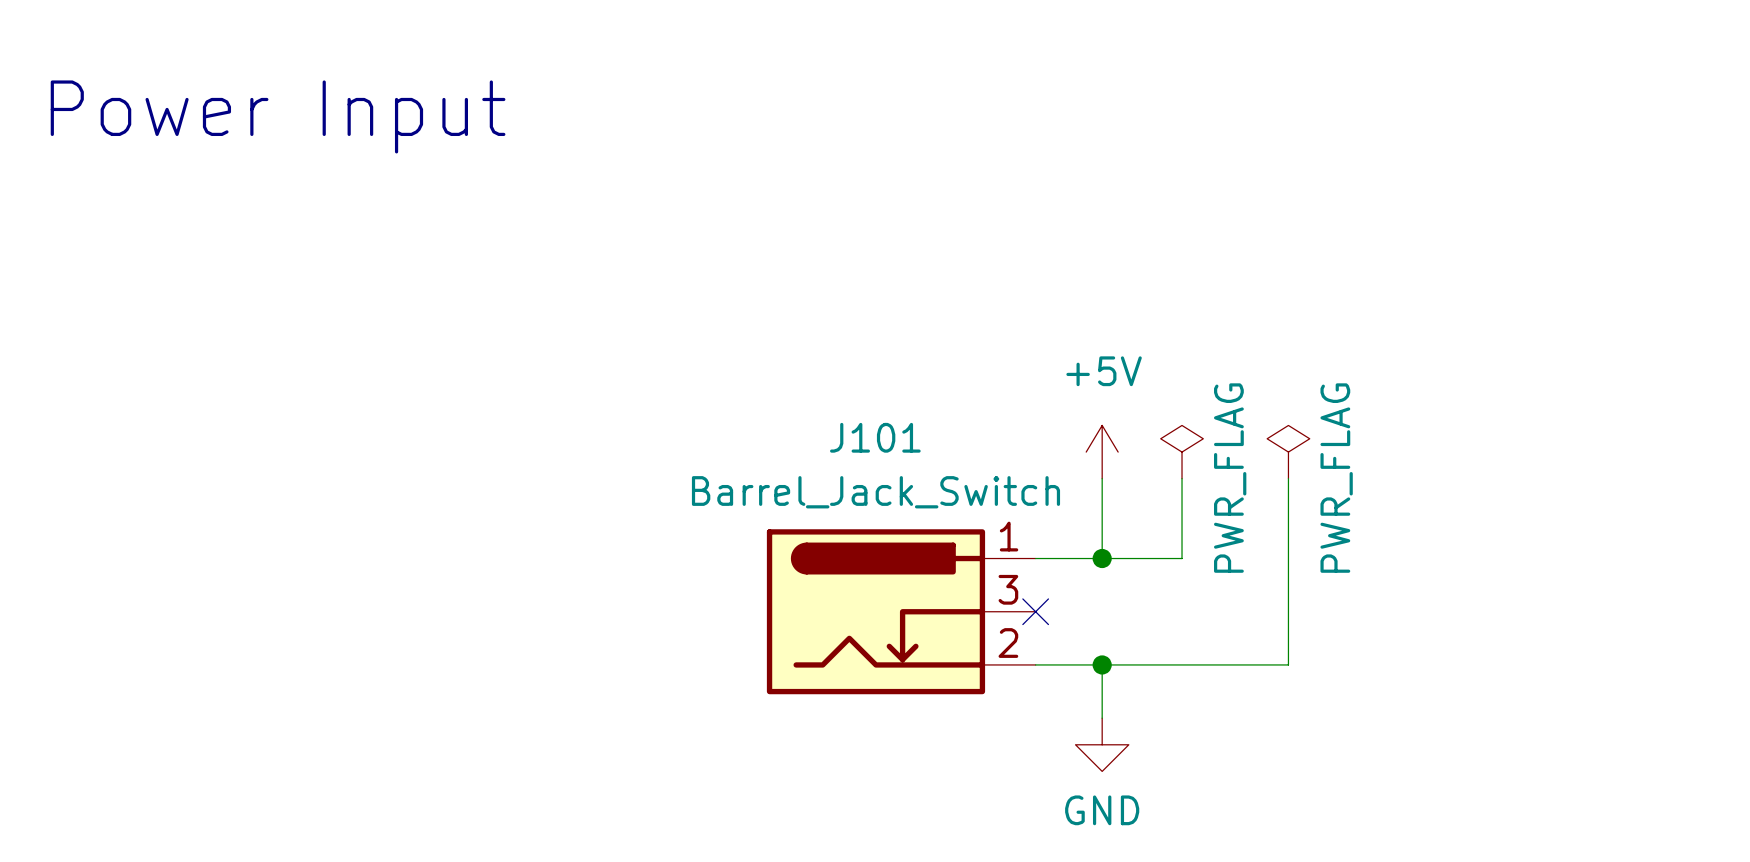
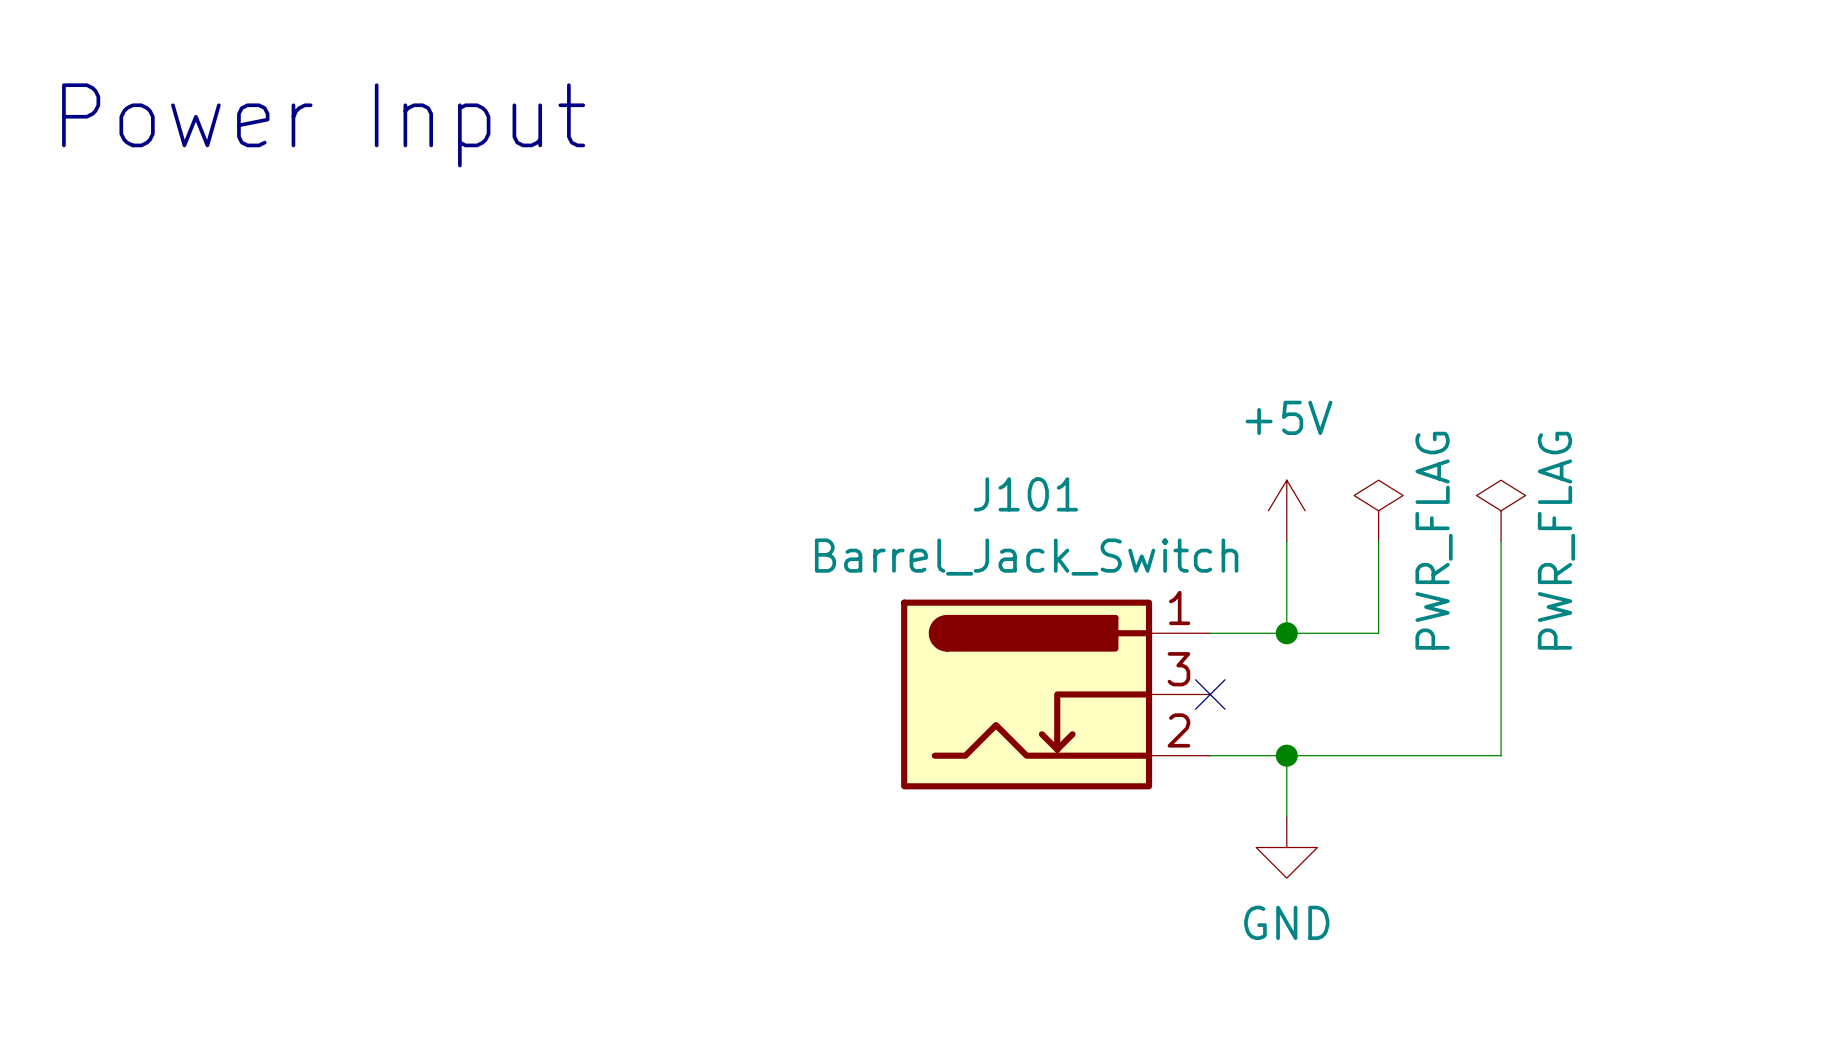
text position: Power Input (278, 116) -> Power Input (323, 125)

